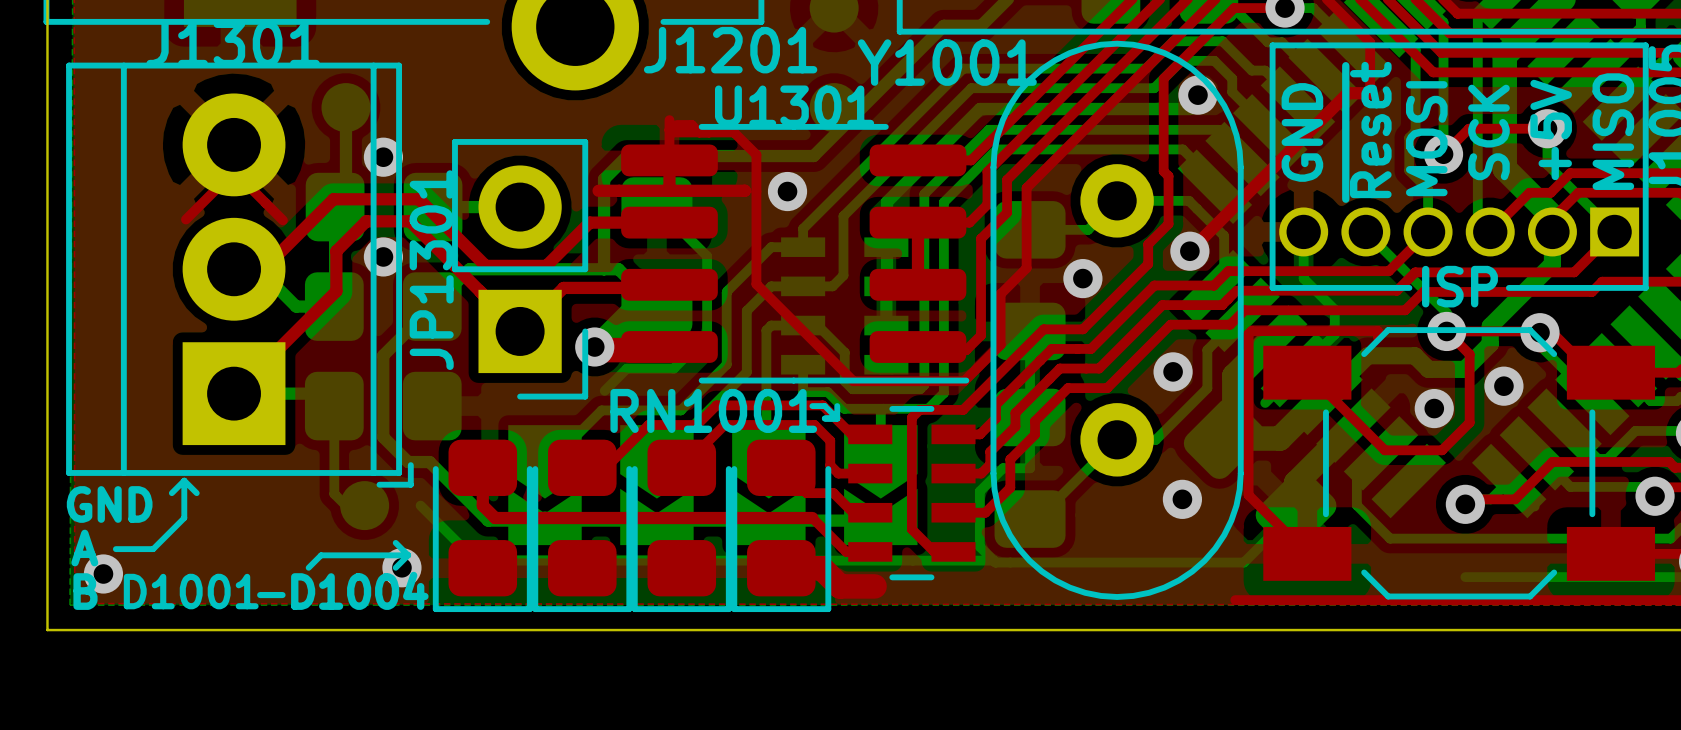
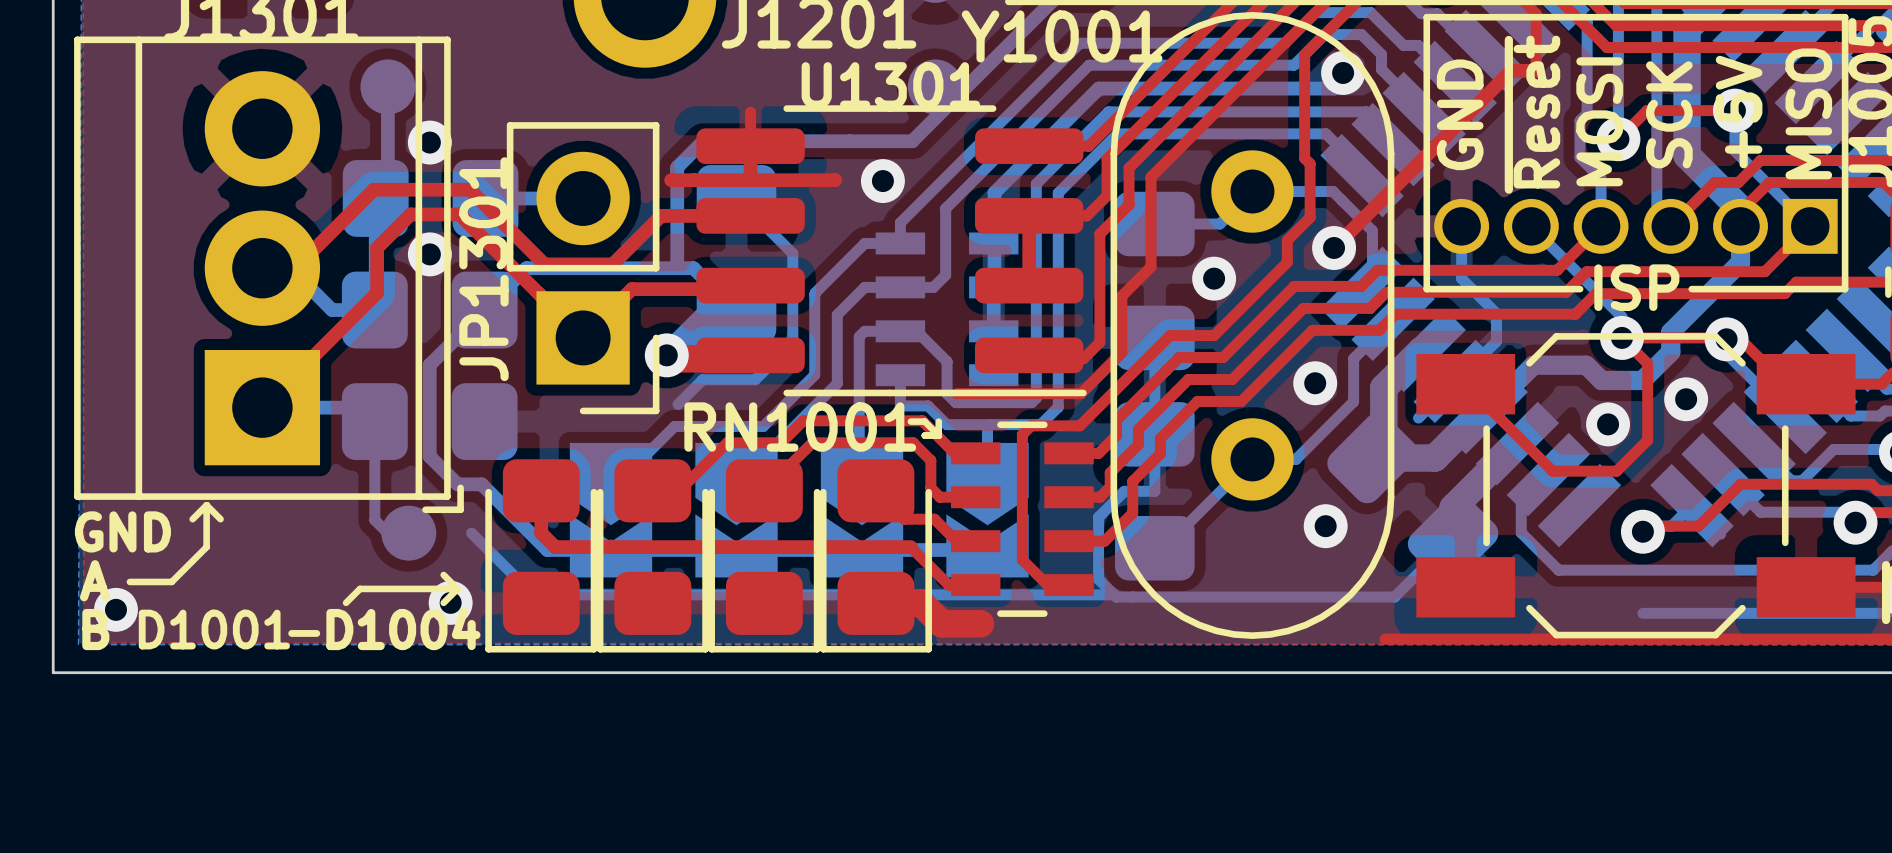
top track: (669, 120) (669, 130) (671, 132) (734, 132) (756, 154) (756, 284) (853, 381) -> none
top track: (676, 124) (691, 124) (699, 132) -> none
top track: (185, 219) (234, 171) (282, 220) -> none
top track: (1377, 337) (1377, 331) (1251, 331) (1248, 334) (1248, 495) (1307, 553) -> none

